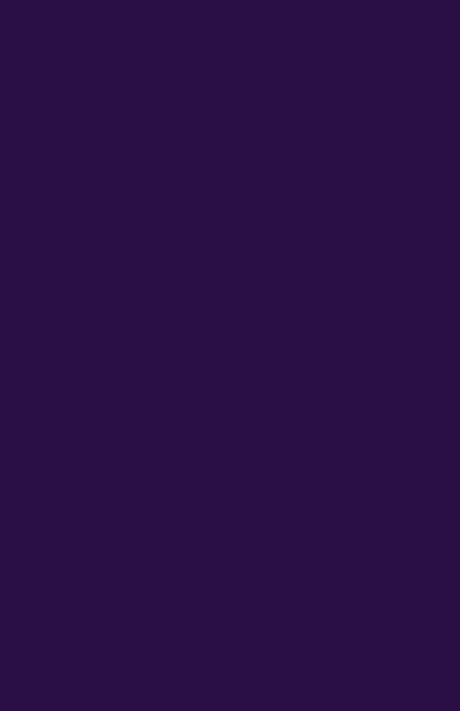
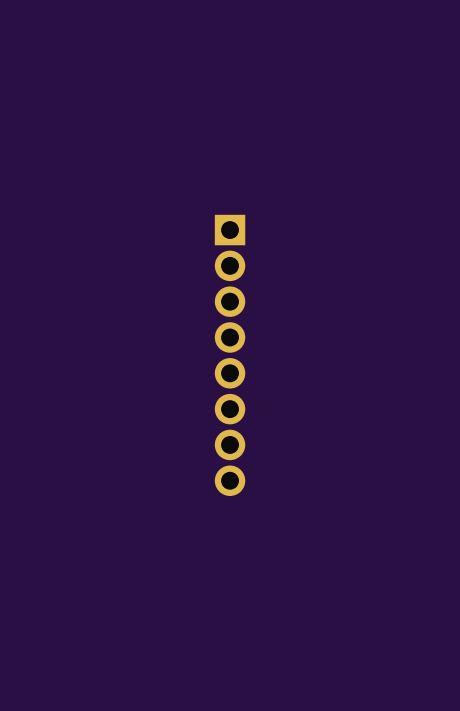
part: none -> (230, 355)

